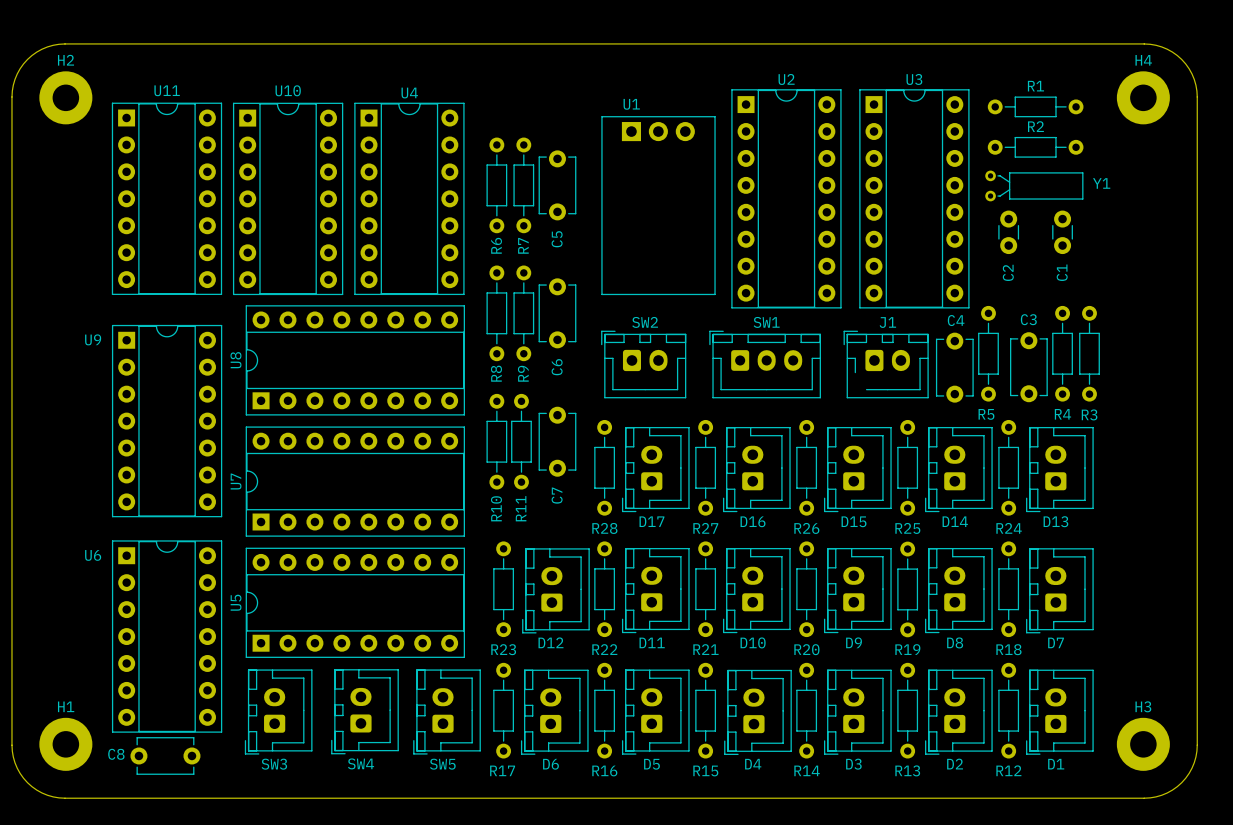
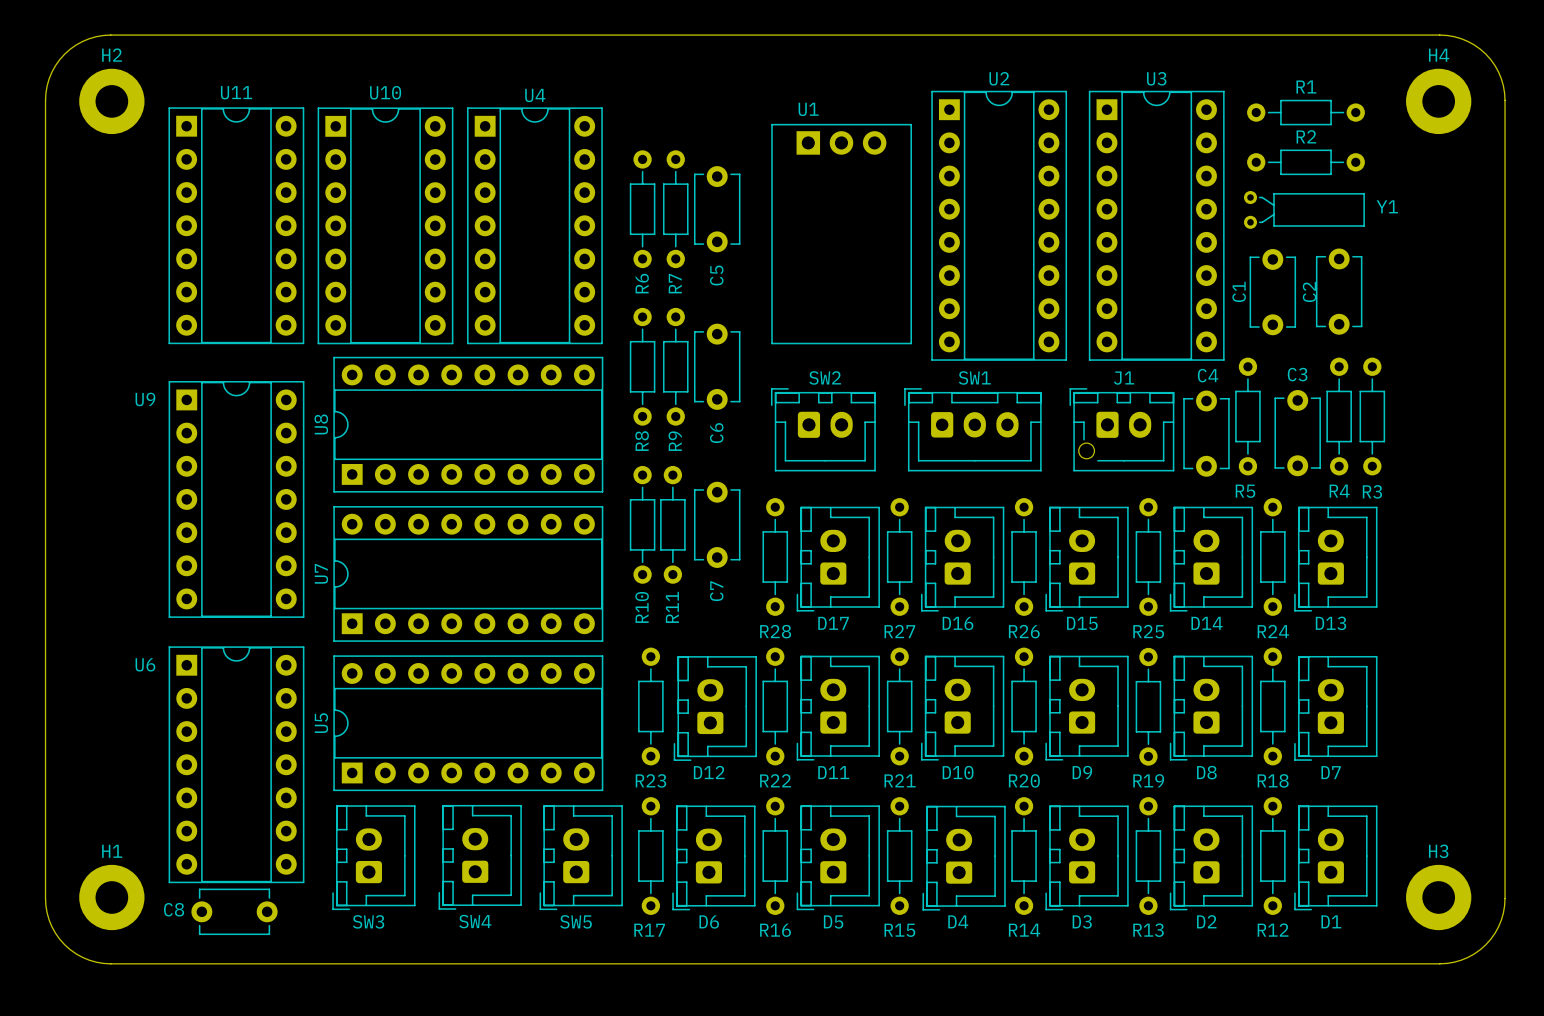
C2 footprint: [998, 210, 1020, 255] -> [1249, 249, 1297, 336]
C1 footprint: [1052, 210, 1073, 255] -> [1315, 248, 1363, 335]
C2 name position: C2 (1008, 272) -> C2 (1309, 292)
C1 name position: C1 (1062, 272) -> C1 (1239, 291)
J1 footprint: [843, 330, 929, 399] -> [1069, 388, 1175, 472]

